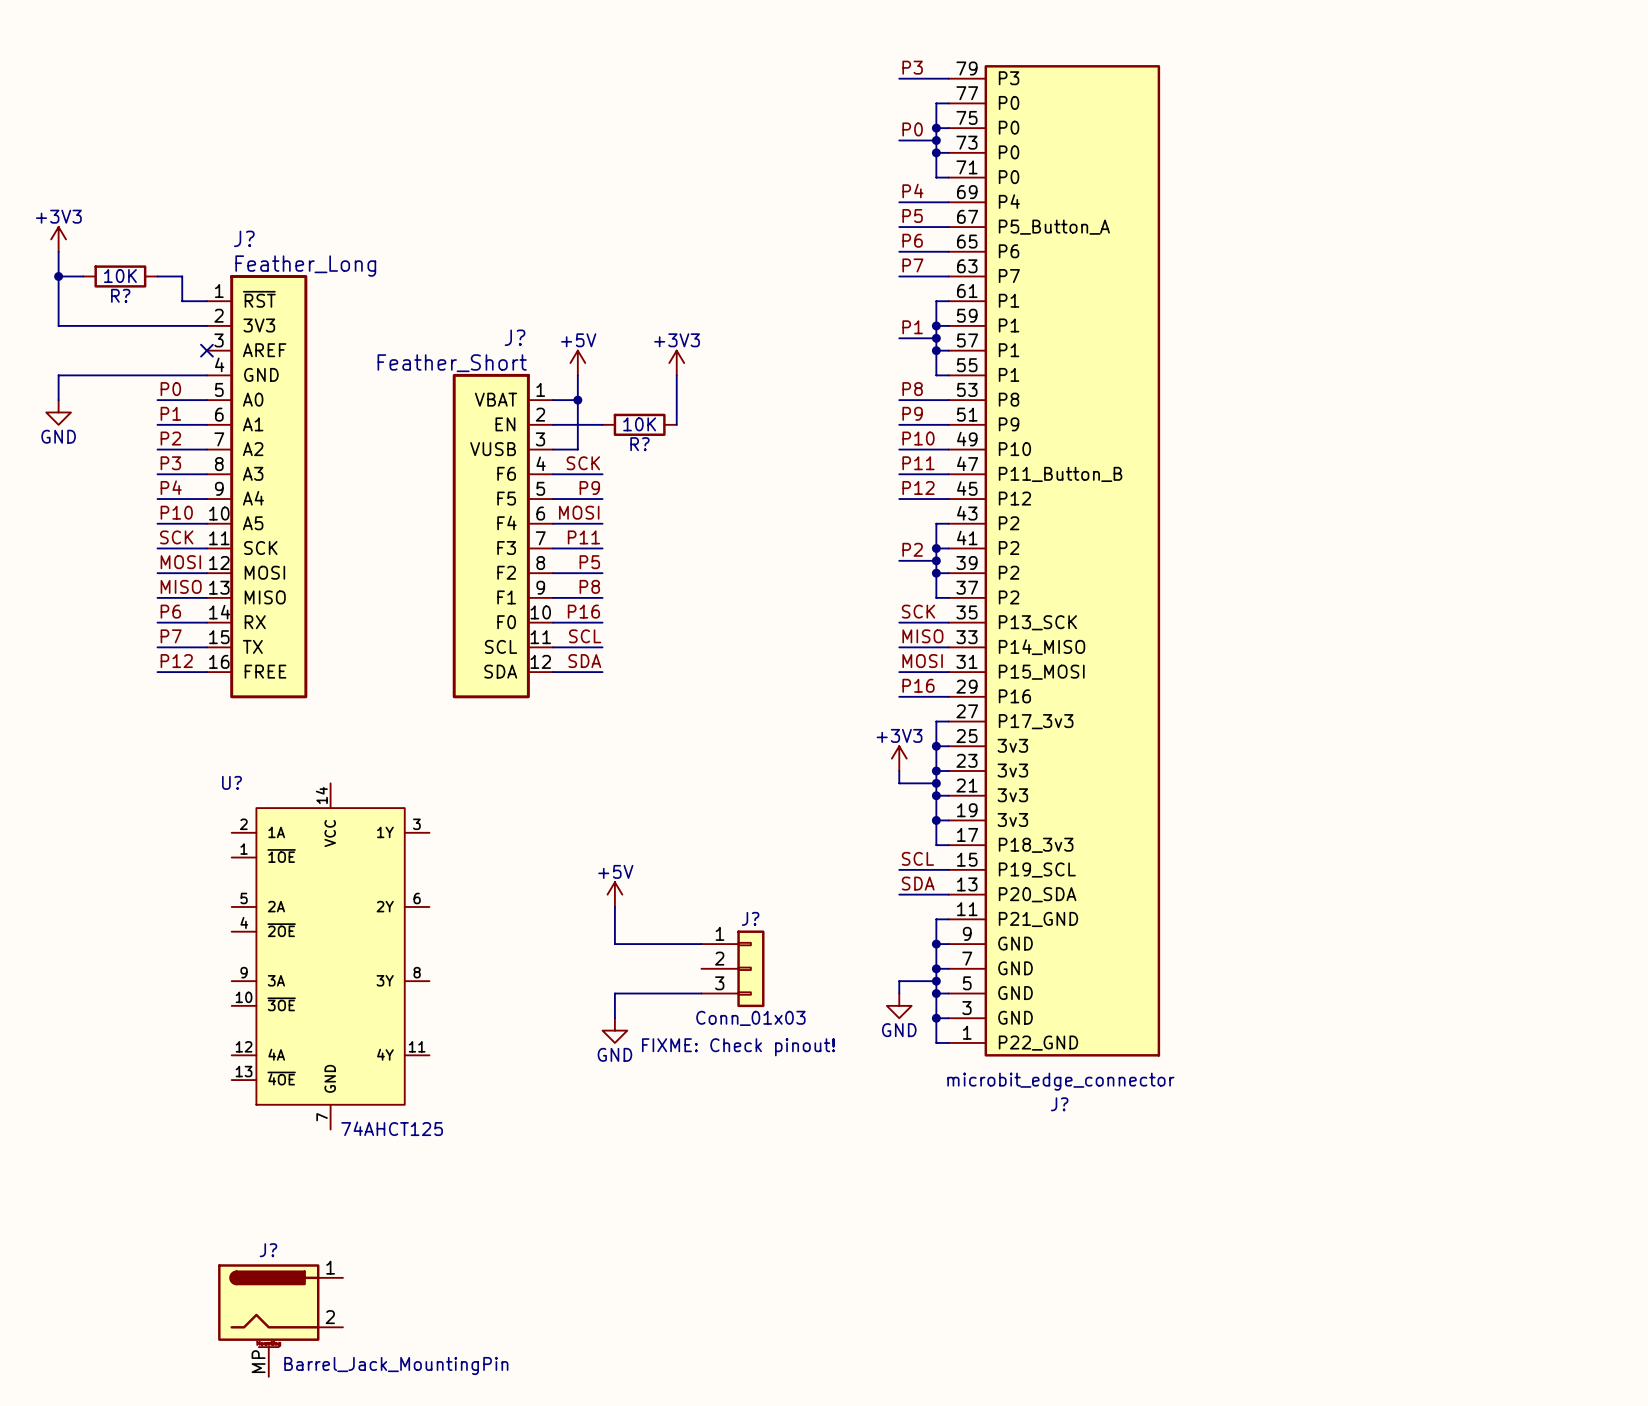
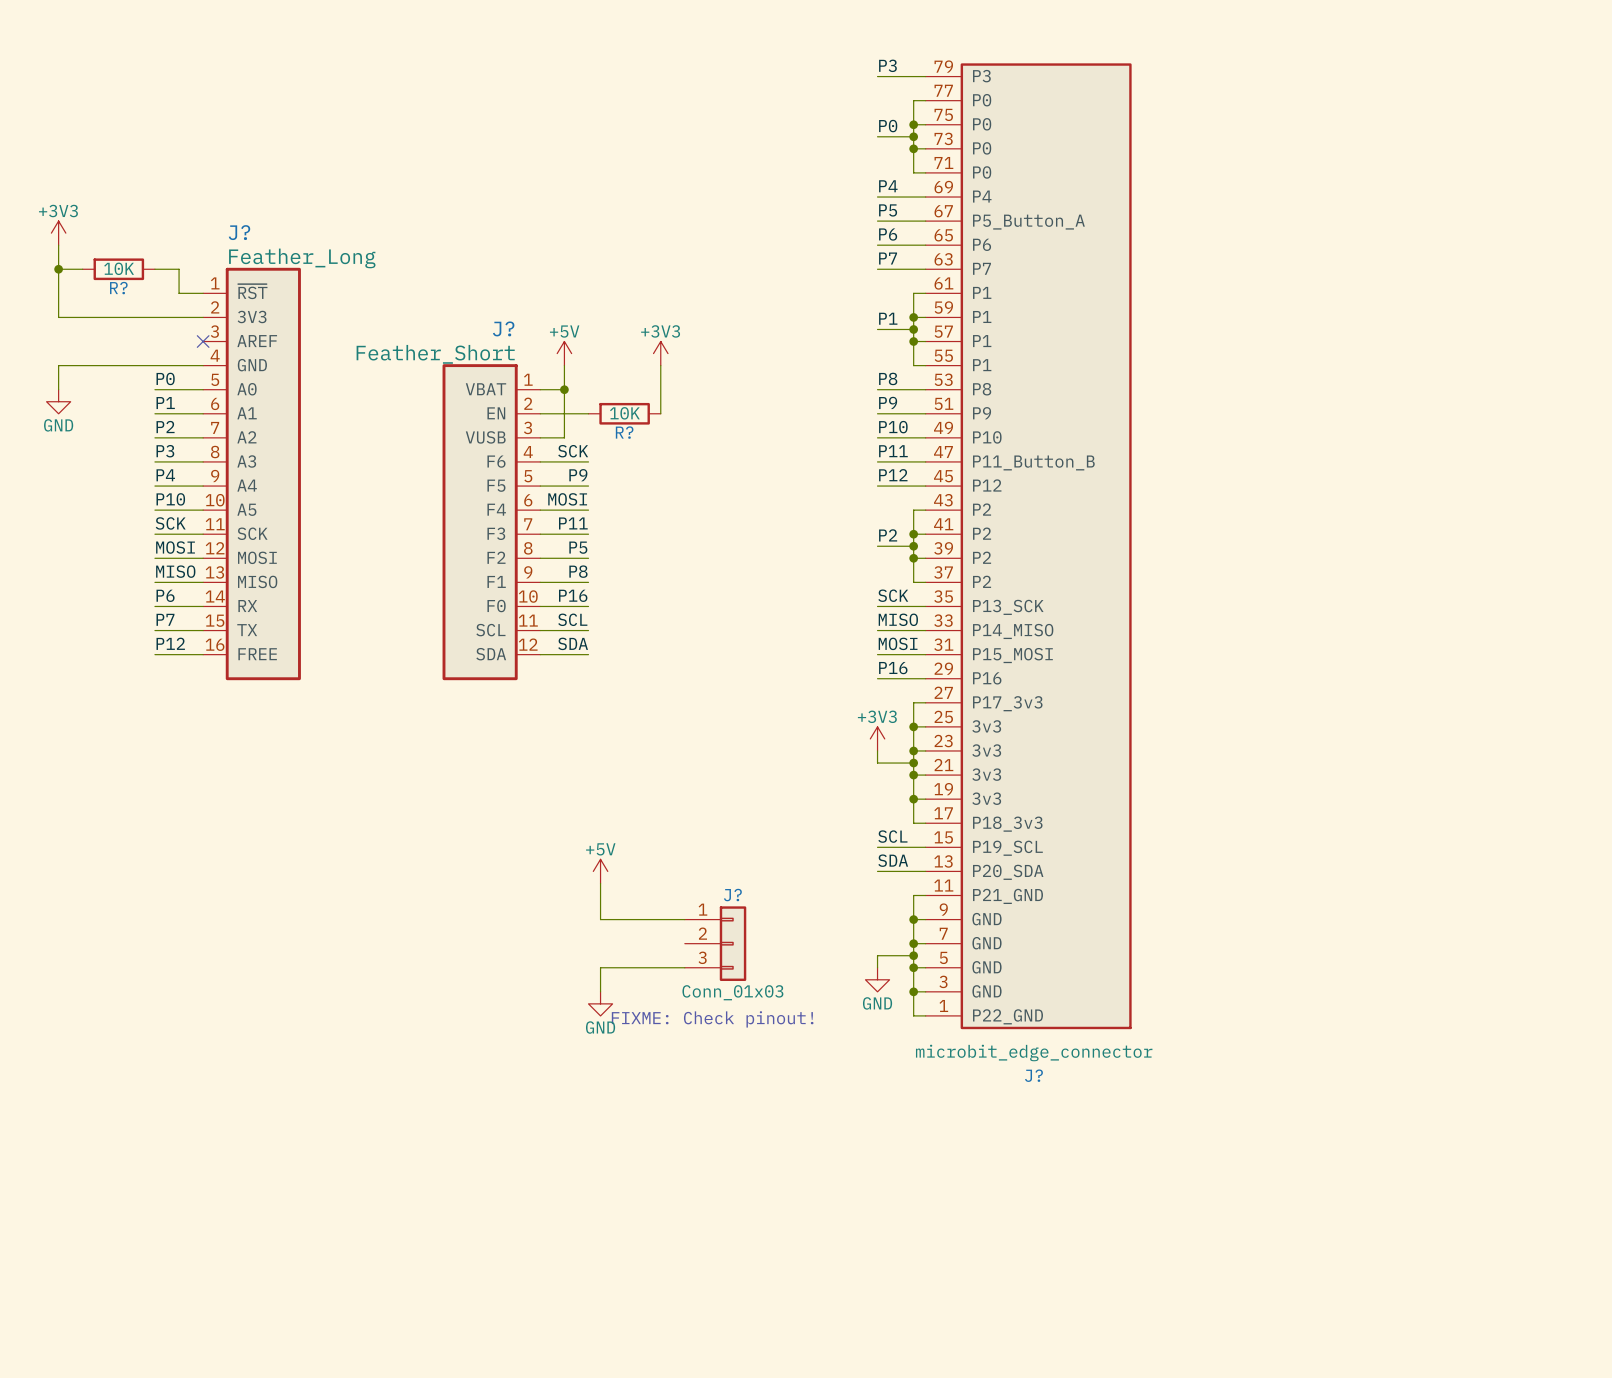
U?: 74AHCT125 (330, 956) -> none
J?: Barrel_Jack_MountingPin (280, 1320) -> none

